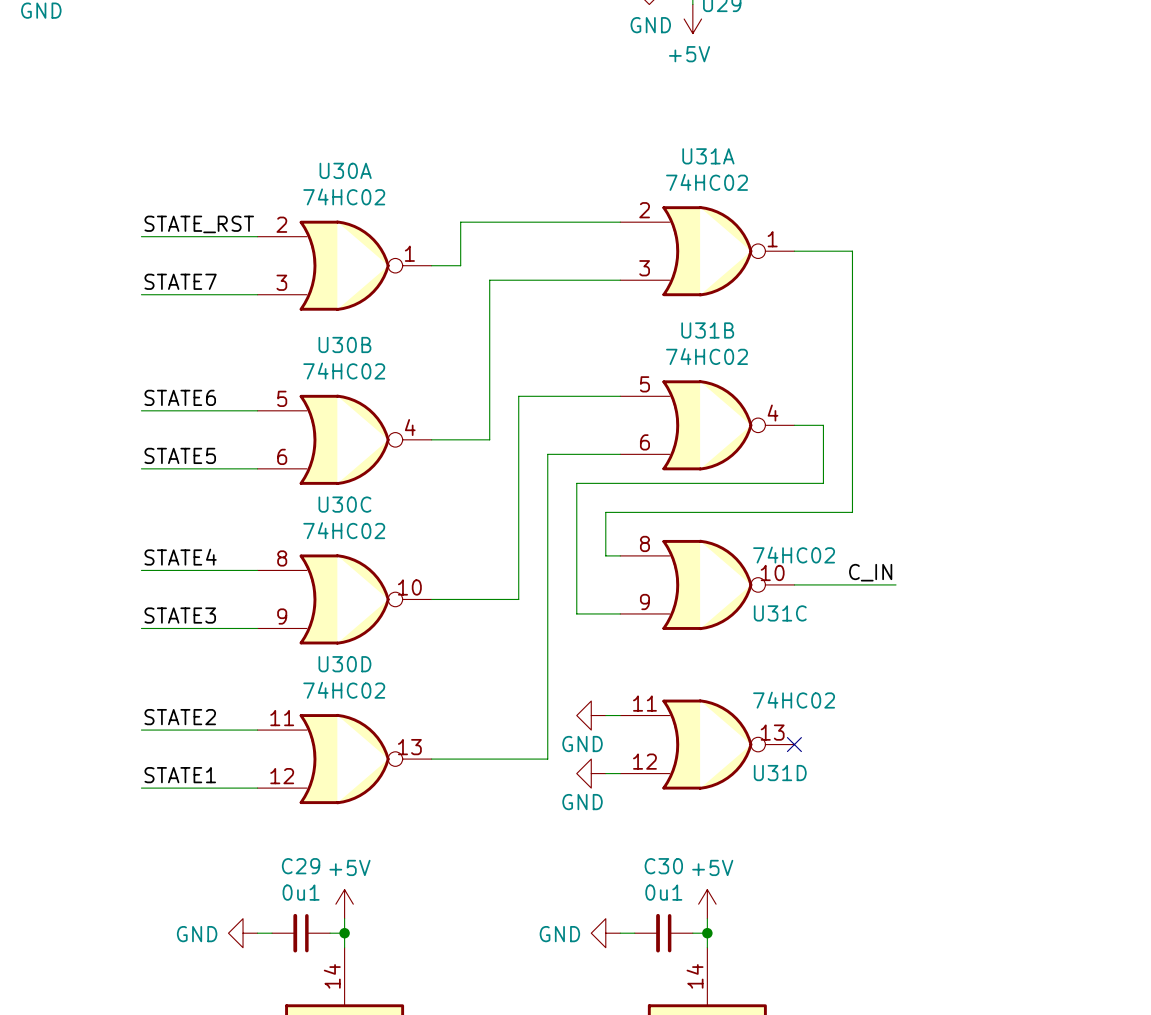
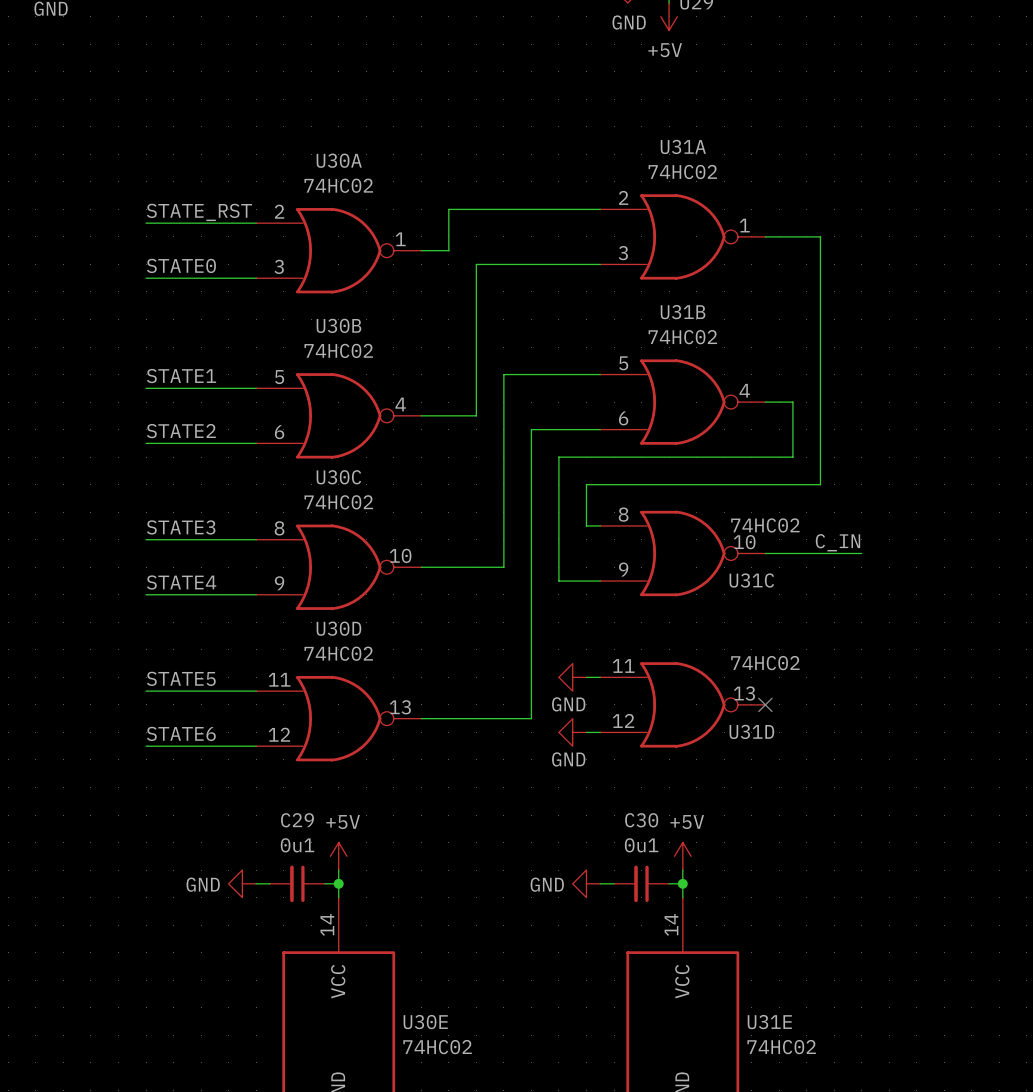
label: STATE7 (180, 281) -> STATE0 (181, 265)
label: STATE6 (180, 397) -> STATE1 (181, 376)
label: STATE5 (180, 455) -> STATE2 (181, 431)
label: STATE4 (180, 557) -> STATE3 (181, 527)
label: STATE3 (180, 615) -> STATE4 (181, 582)
label: STATE2 (180, 717) -> STATE5 (181, 678)
label: STATE1 (180, 775) -> STATE6 (181, 733)

